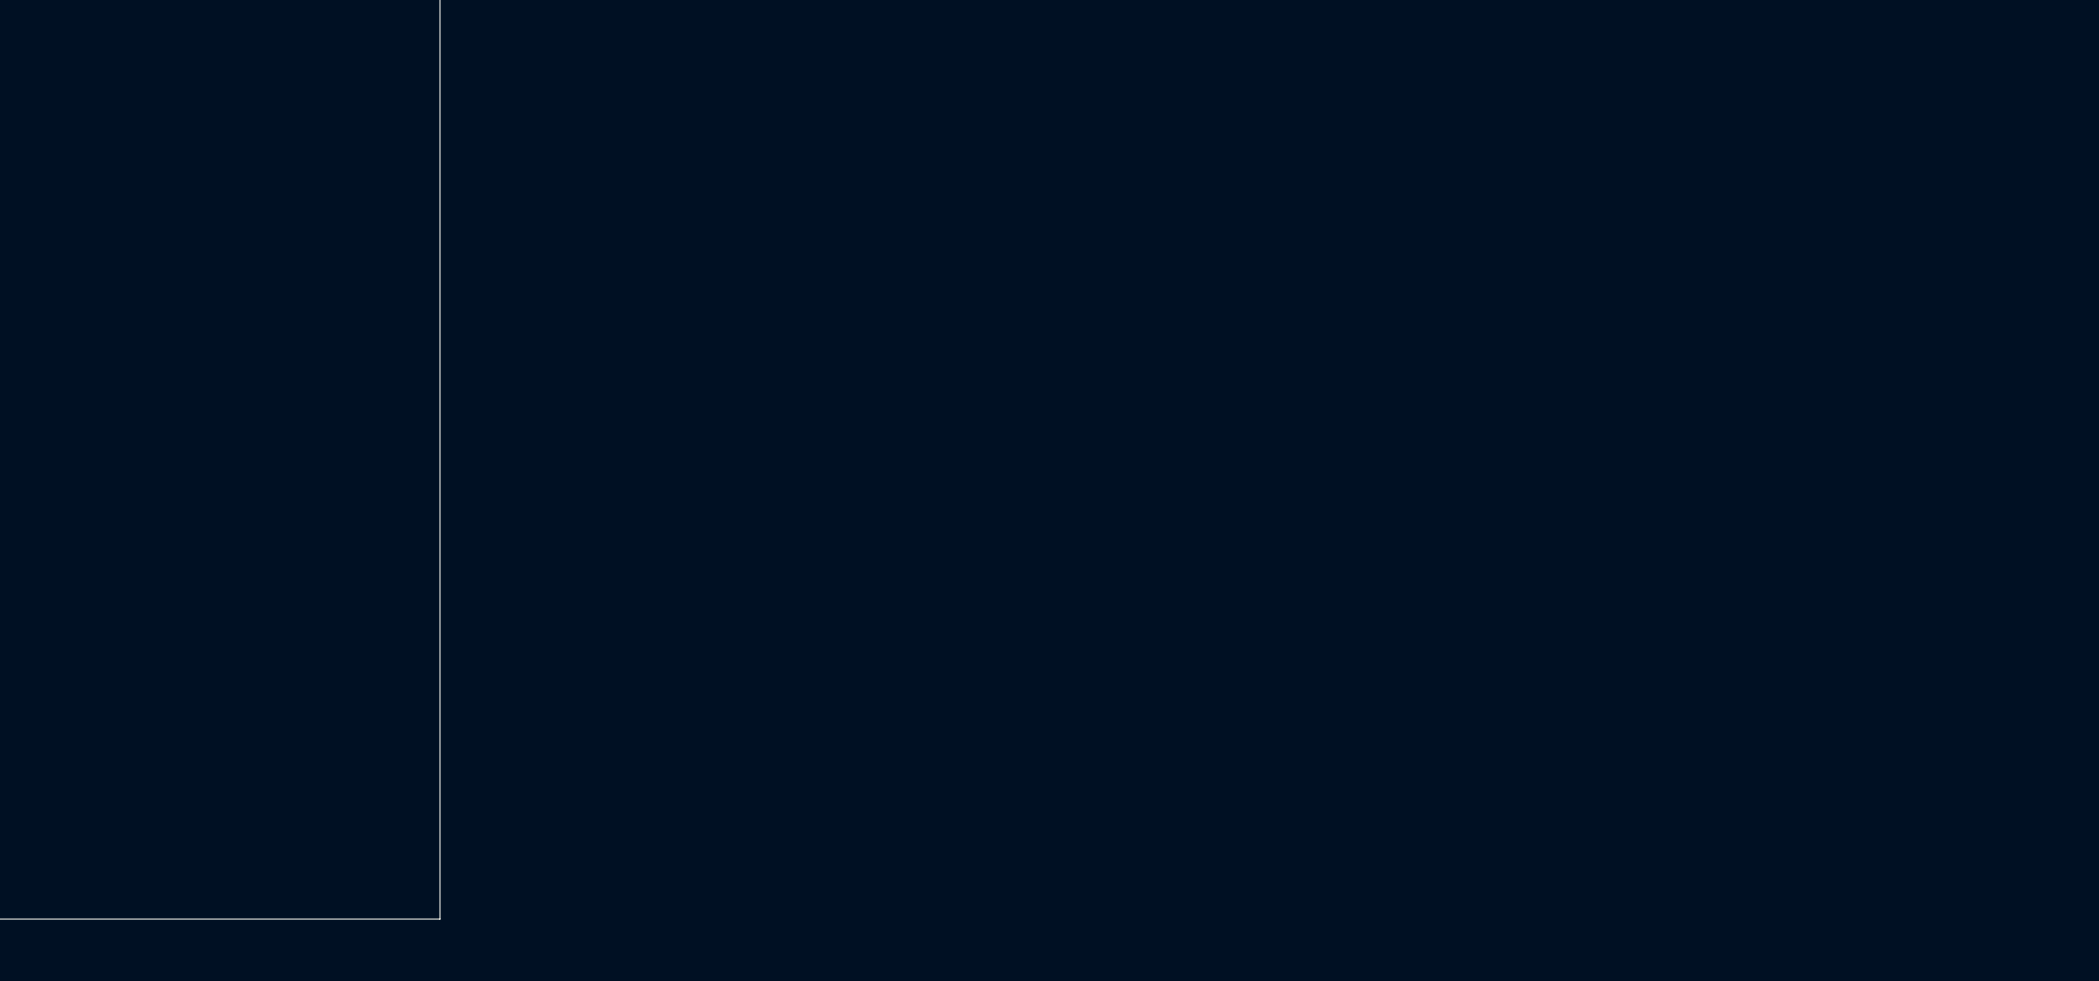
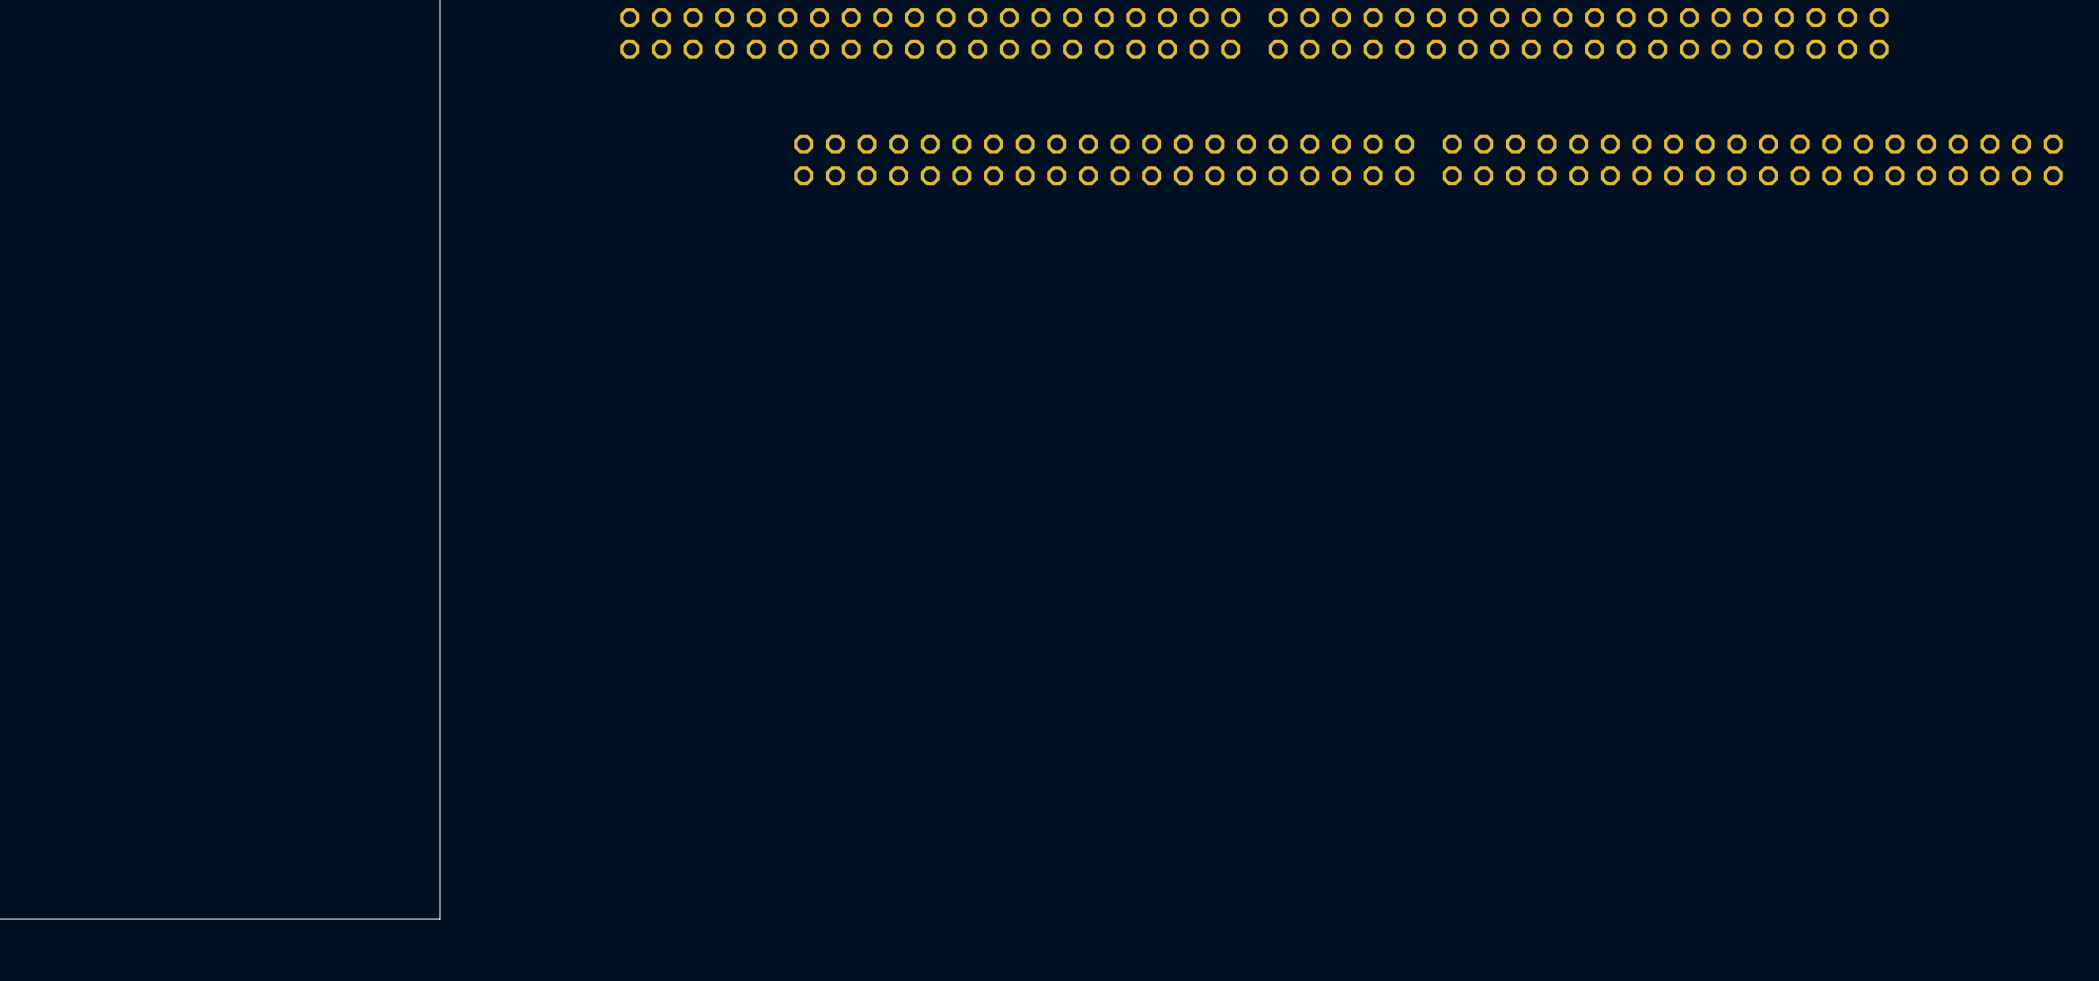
part: none -> (930, 33)
part: none -> (1578, 33)
part: none -> (1104, 159)
part: none -> (1752, 159)

